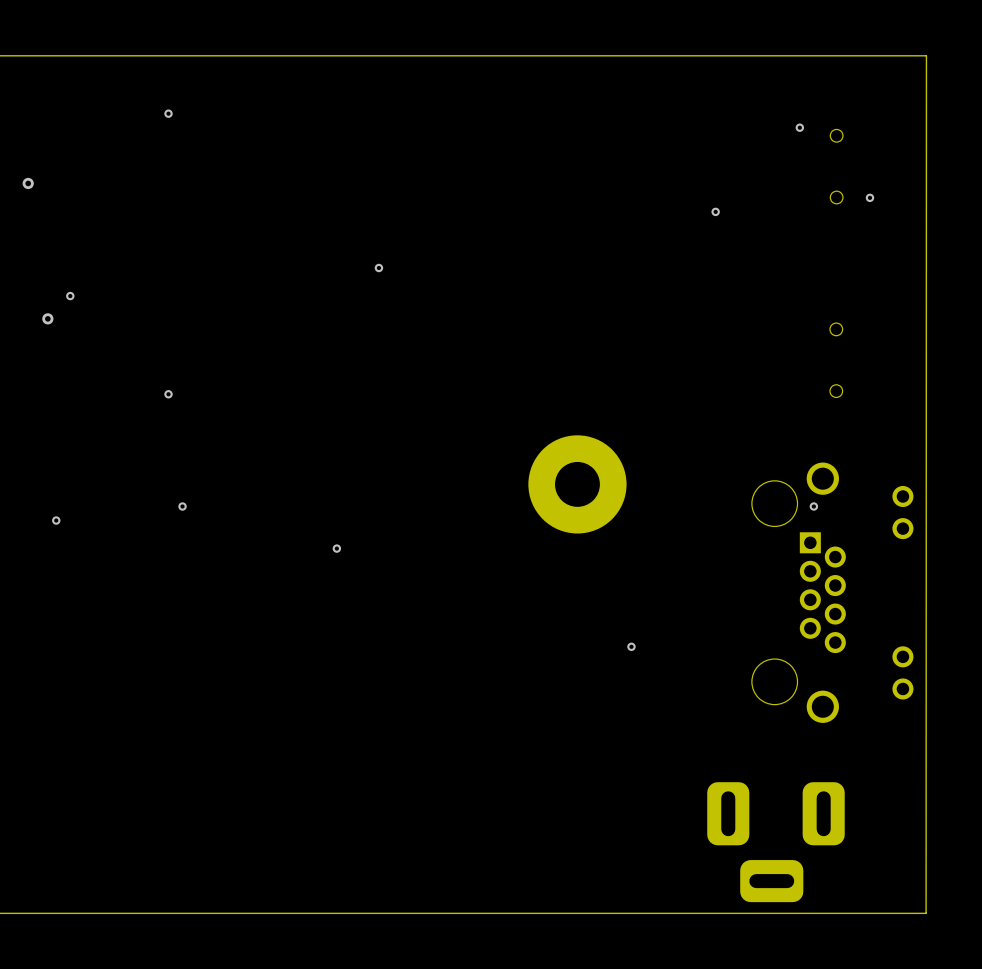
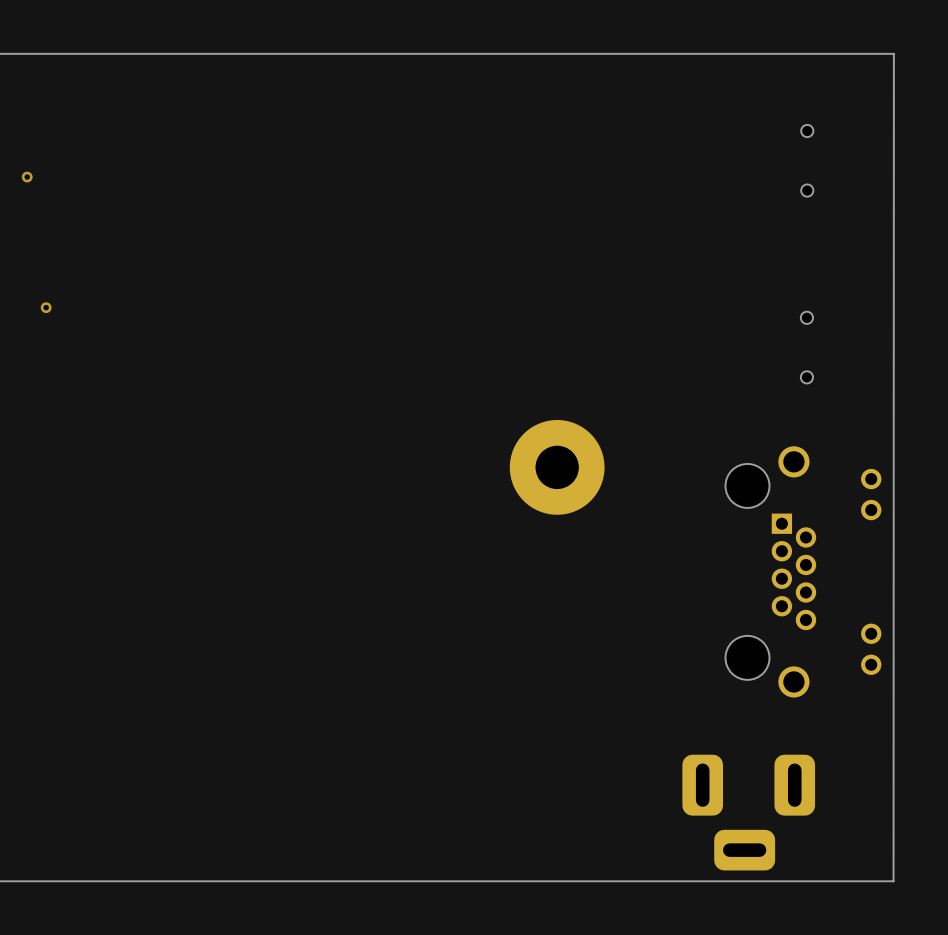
via: (168, 113) -> none
via: (799, 127) -> none
via: (869, 197) -> none
via: (715, 211) -> none
via: (378, 268) -> none
via: (70, 296) -> none
via: (168, 394) -> none
via: (182, 506) -> none
via: (813, 506) -> none
via: (56, 520) -> none
via: (336, 548) -> none
via: (631, 646) -> none

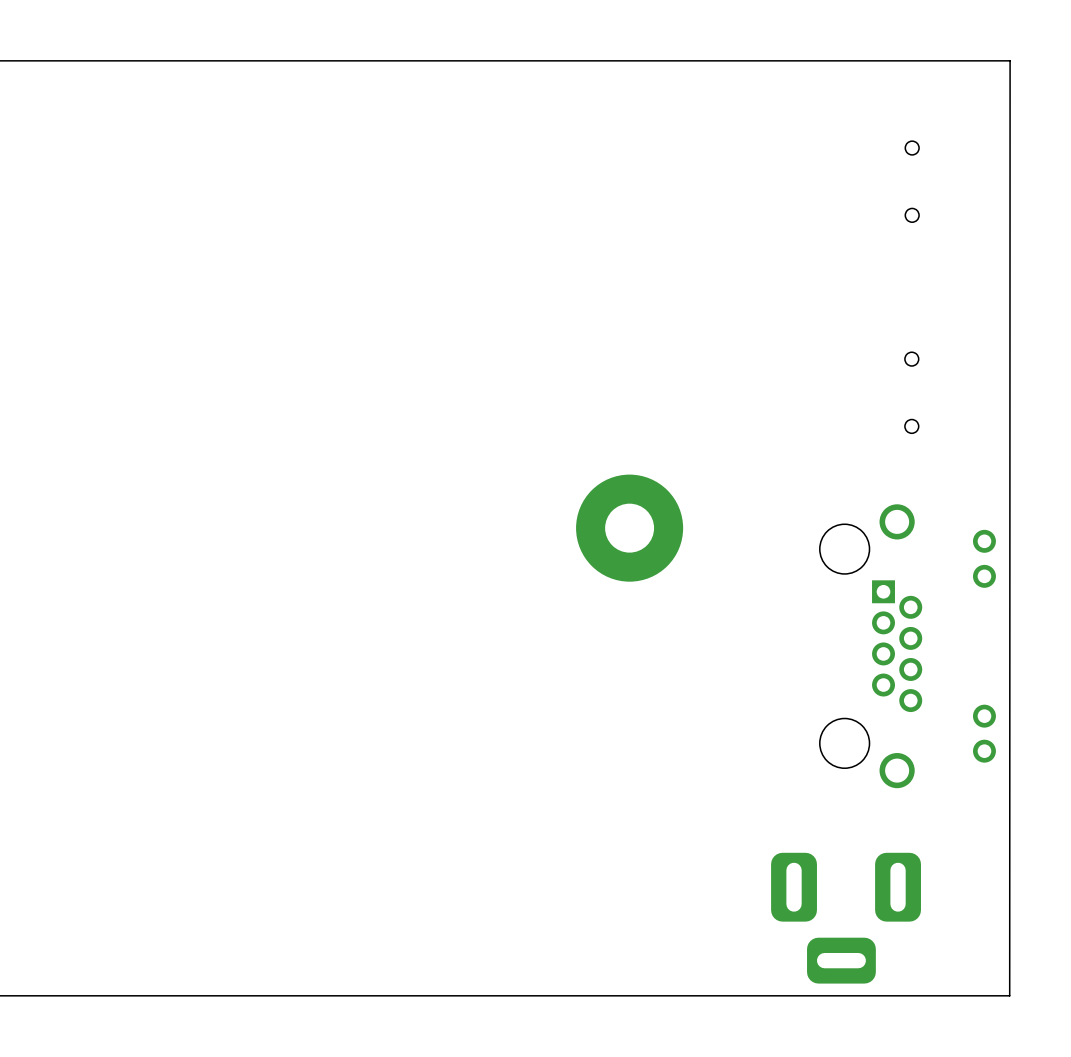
via: (27, 177) -> none
via: (46, 307) -> none

